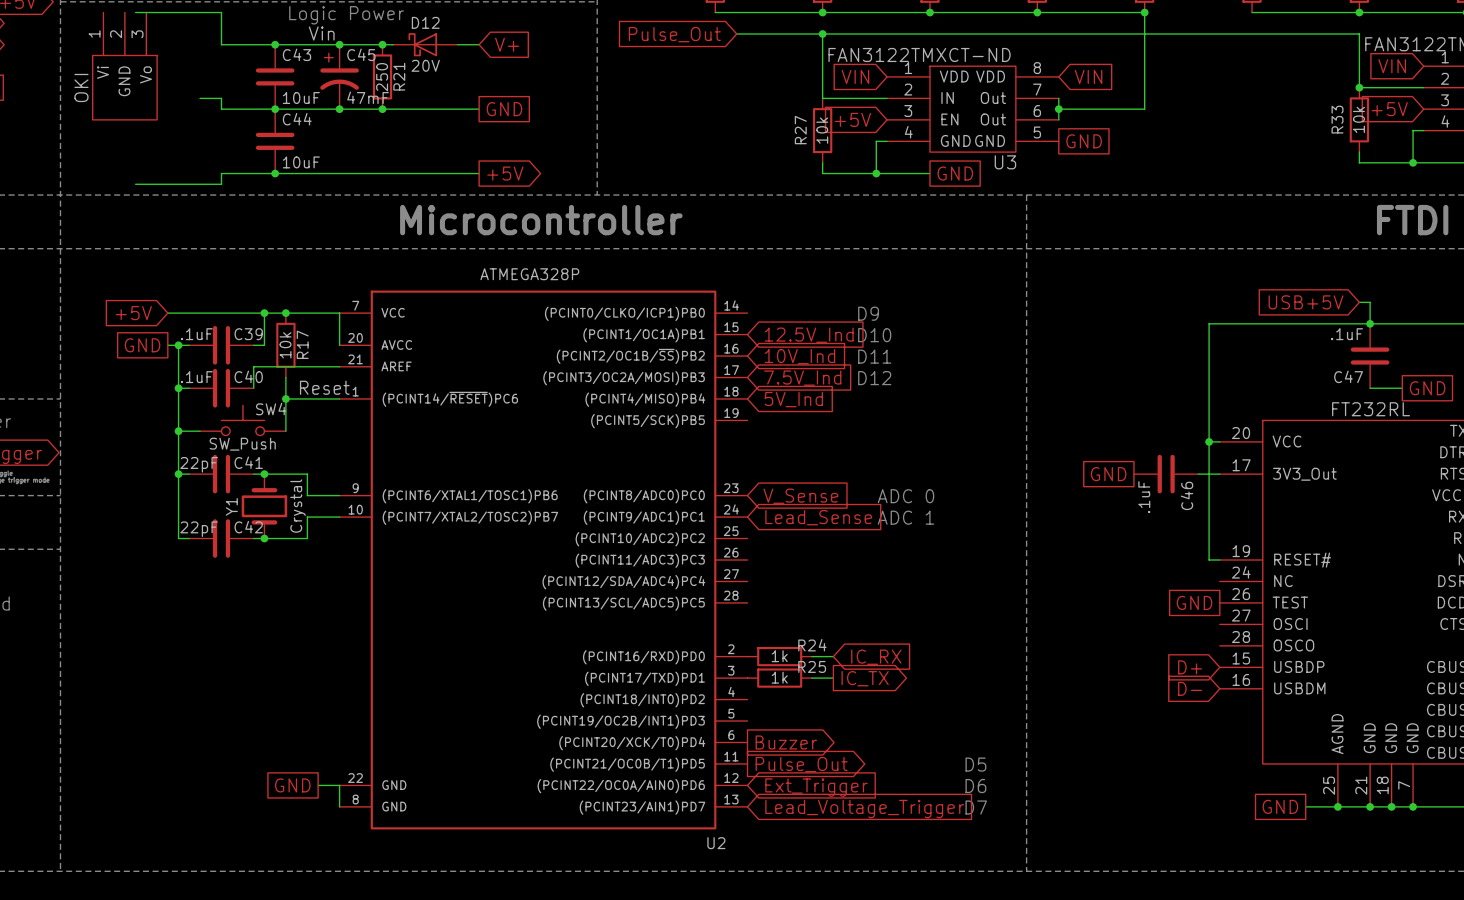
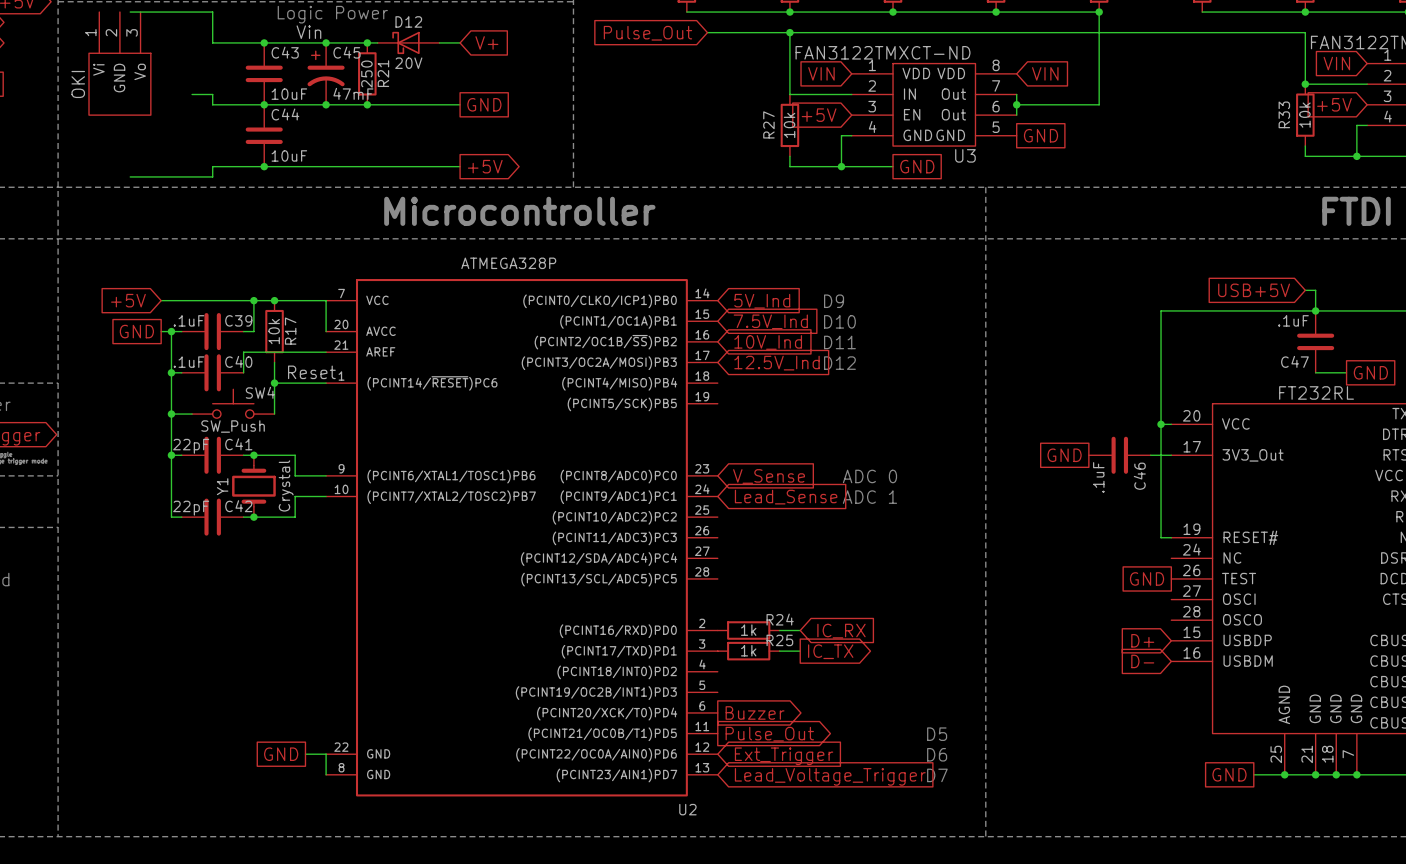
global label: 12.5V_Ind (809, 335) -> 7.5V_Ind (770, 321)
global label: 7.5V_Ind (802, 378) -> 12.5V_Ind (776, 363)
global label position: 5V_Ind (793, 399) -> 5V_Ind (762, 301)

